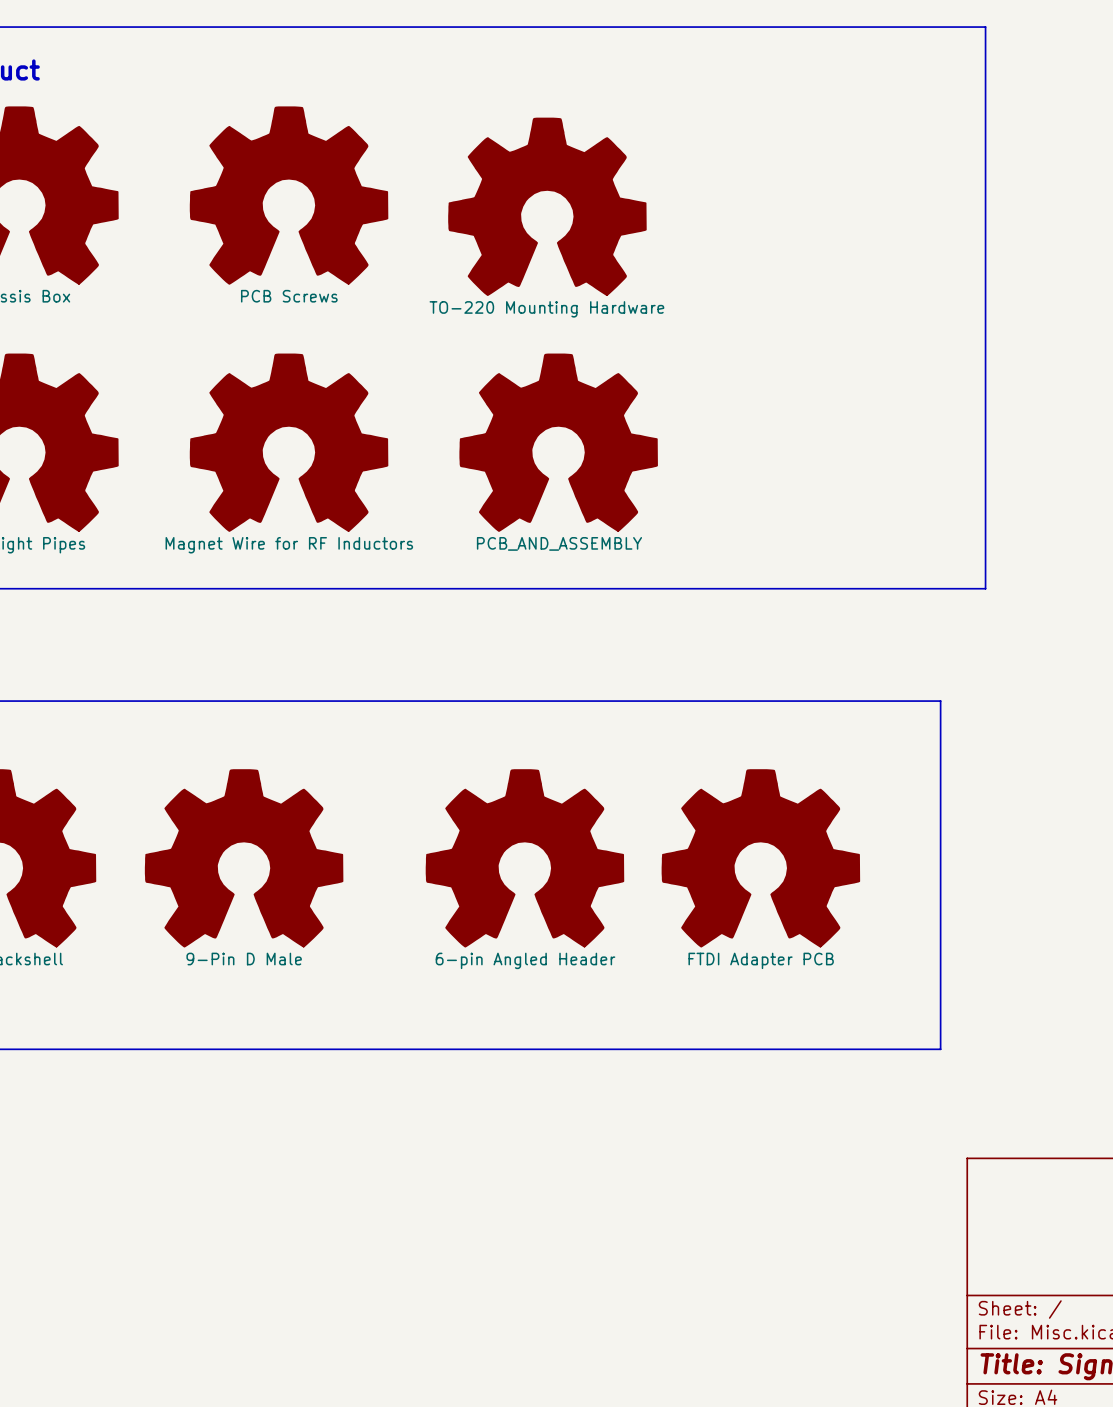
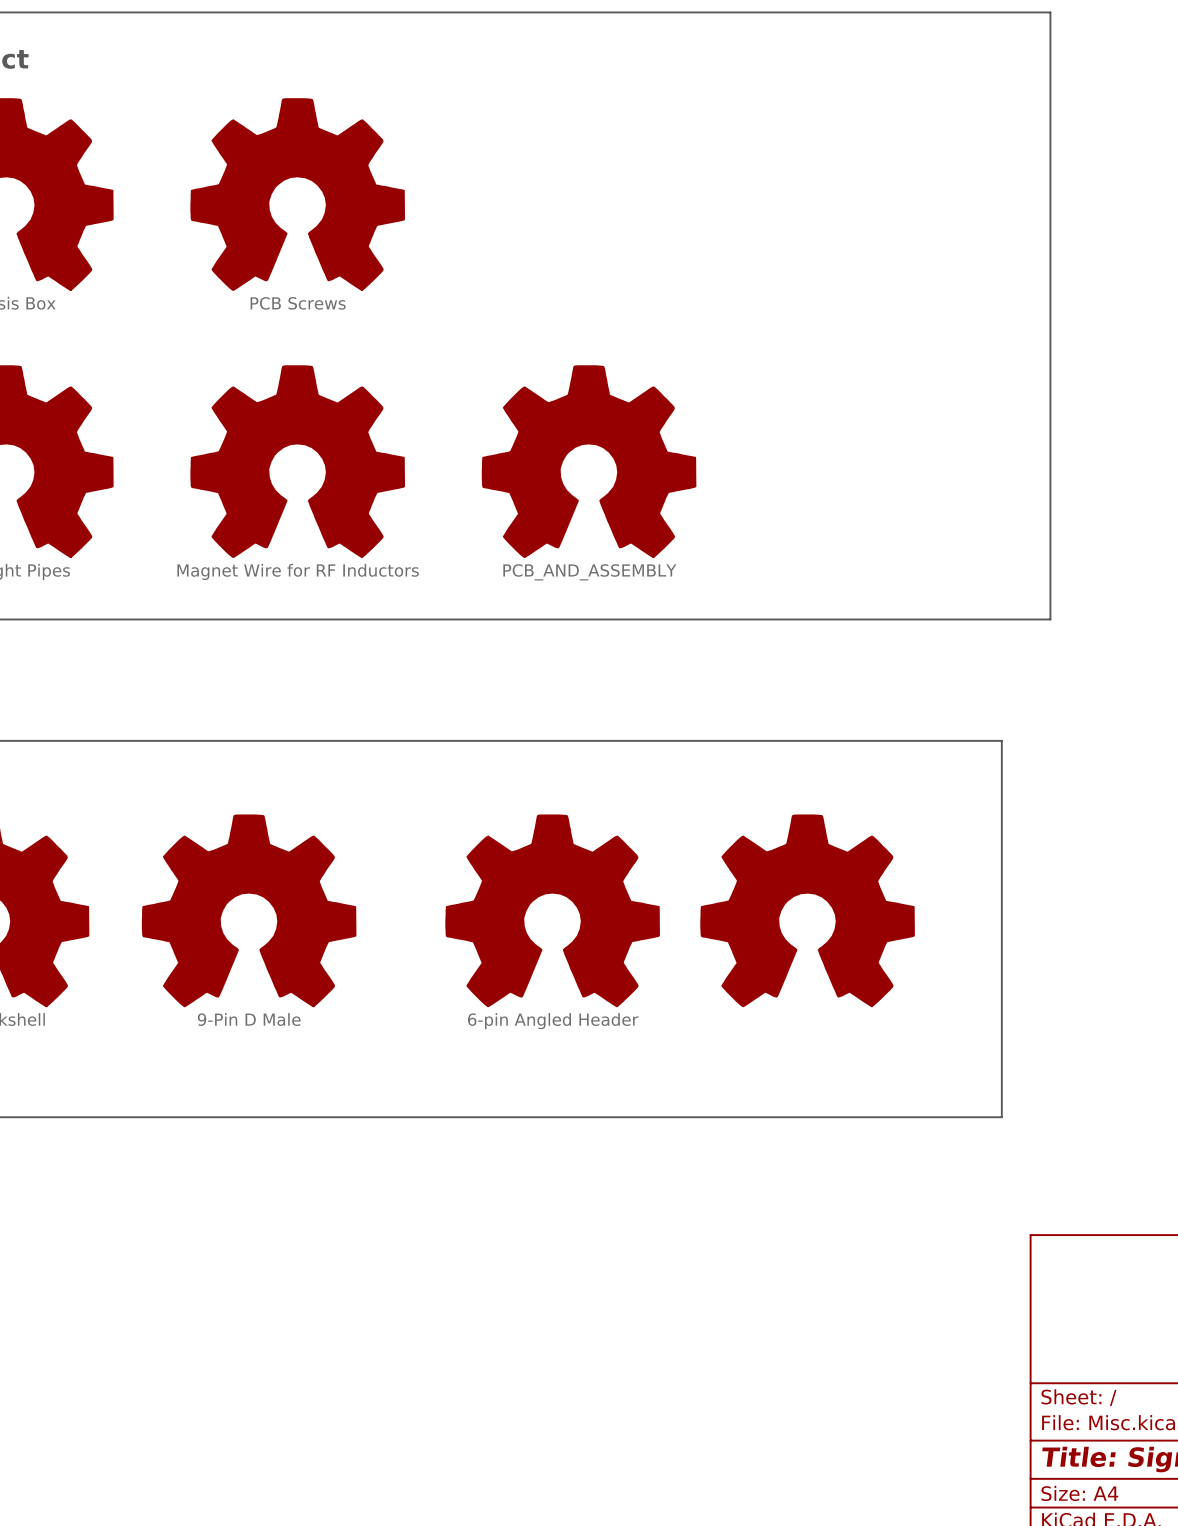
part: TO-220 Mounting Hardware (547, 206) -> none
part value: FTDI Adapter PCB (761, 960) -> none

